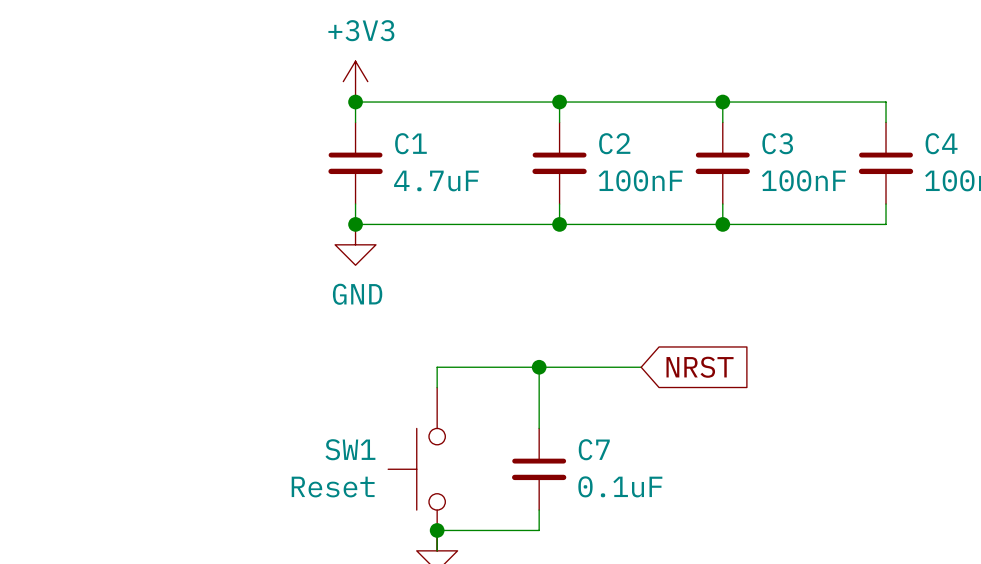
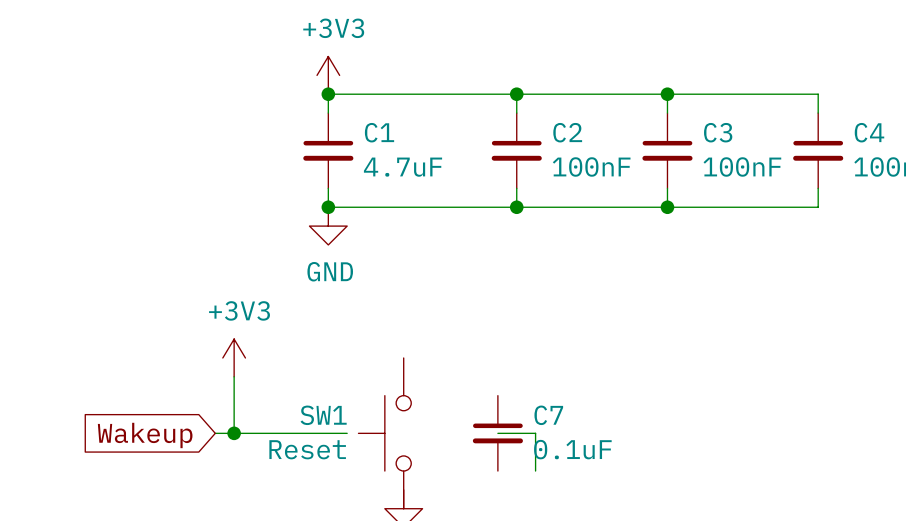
wire: (539, 367) (539, 428) -> (234, 376) (234, 433)
junction: (539, 367) -> none
wire: (641, 367) (437, 367) (437, 387) -> none
global label: NRST (700, 367) -> none
power symbol: none -> +3V3 (234, 357)
wire: none -> (215, 433) (347, 433)
junction: none -> (234, 433)
wire: none -> (497, 433) (535, 433) (535, 471)
global label: none -> Wakeup (145, 435)
wire: (539, 510) (539, 530) (437, 530) (437, 550) -> none
junction: (437, 530) -> none

